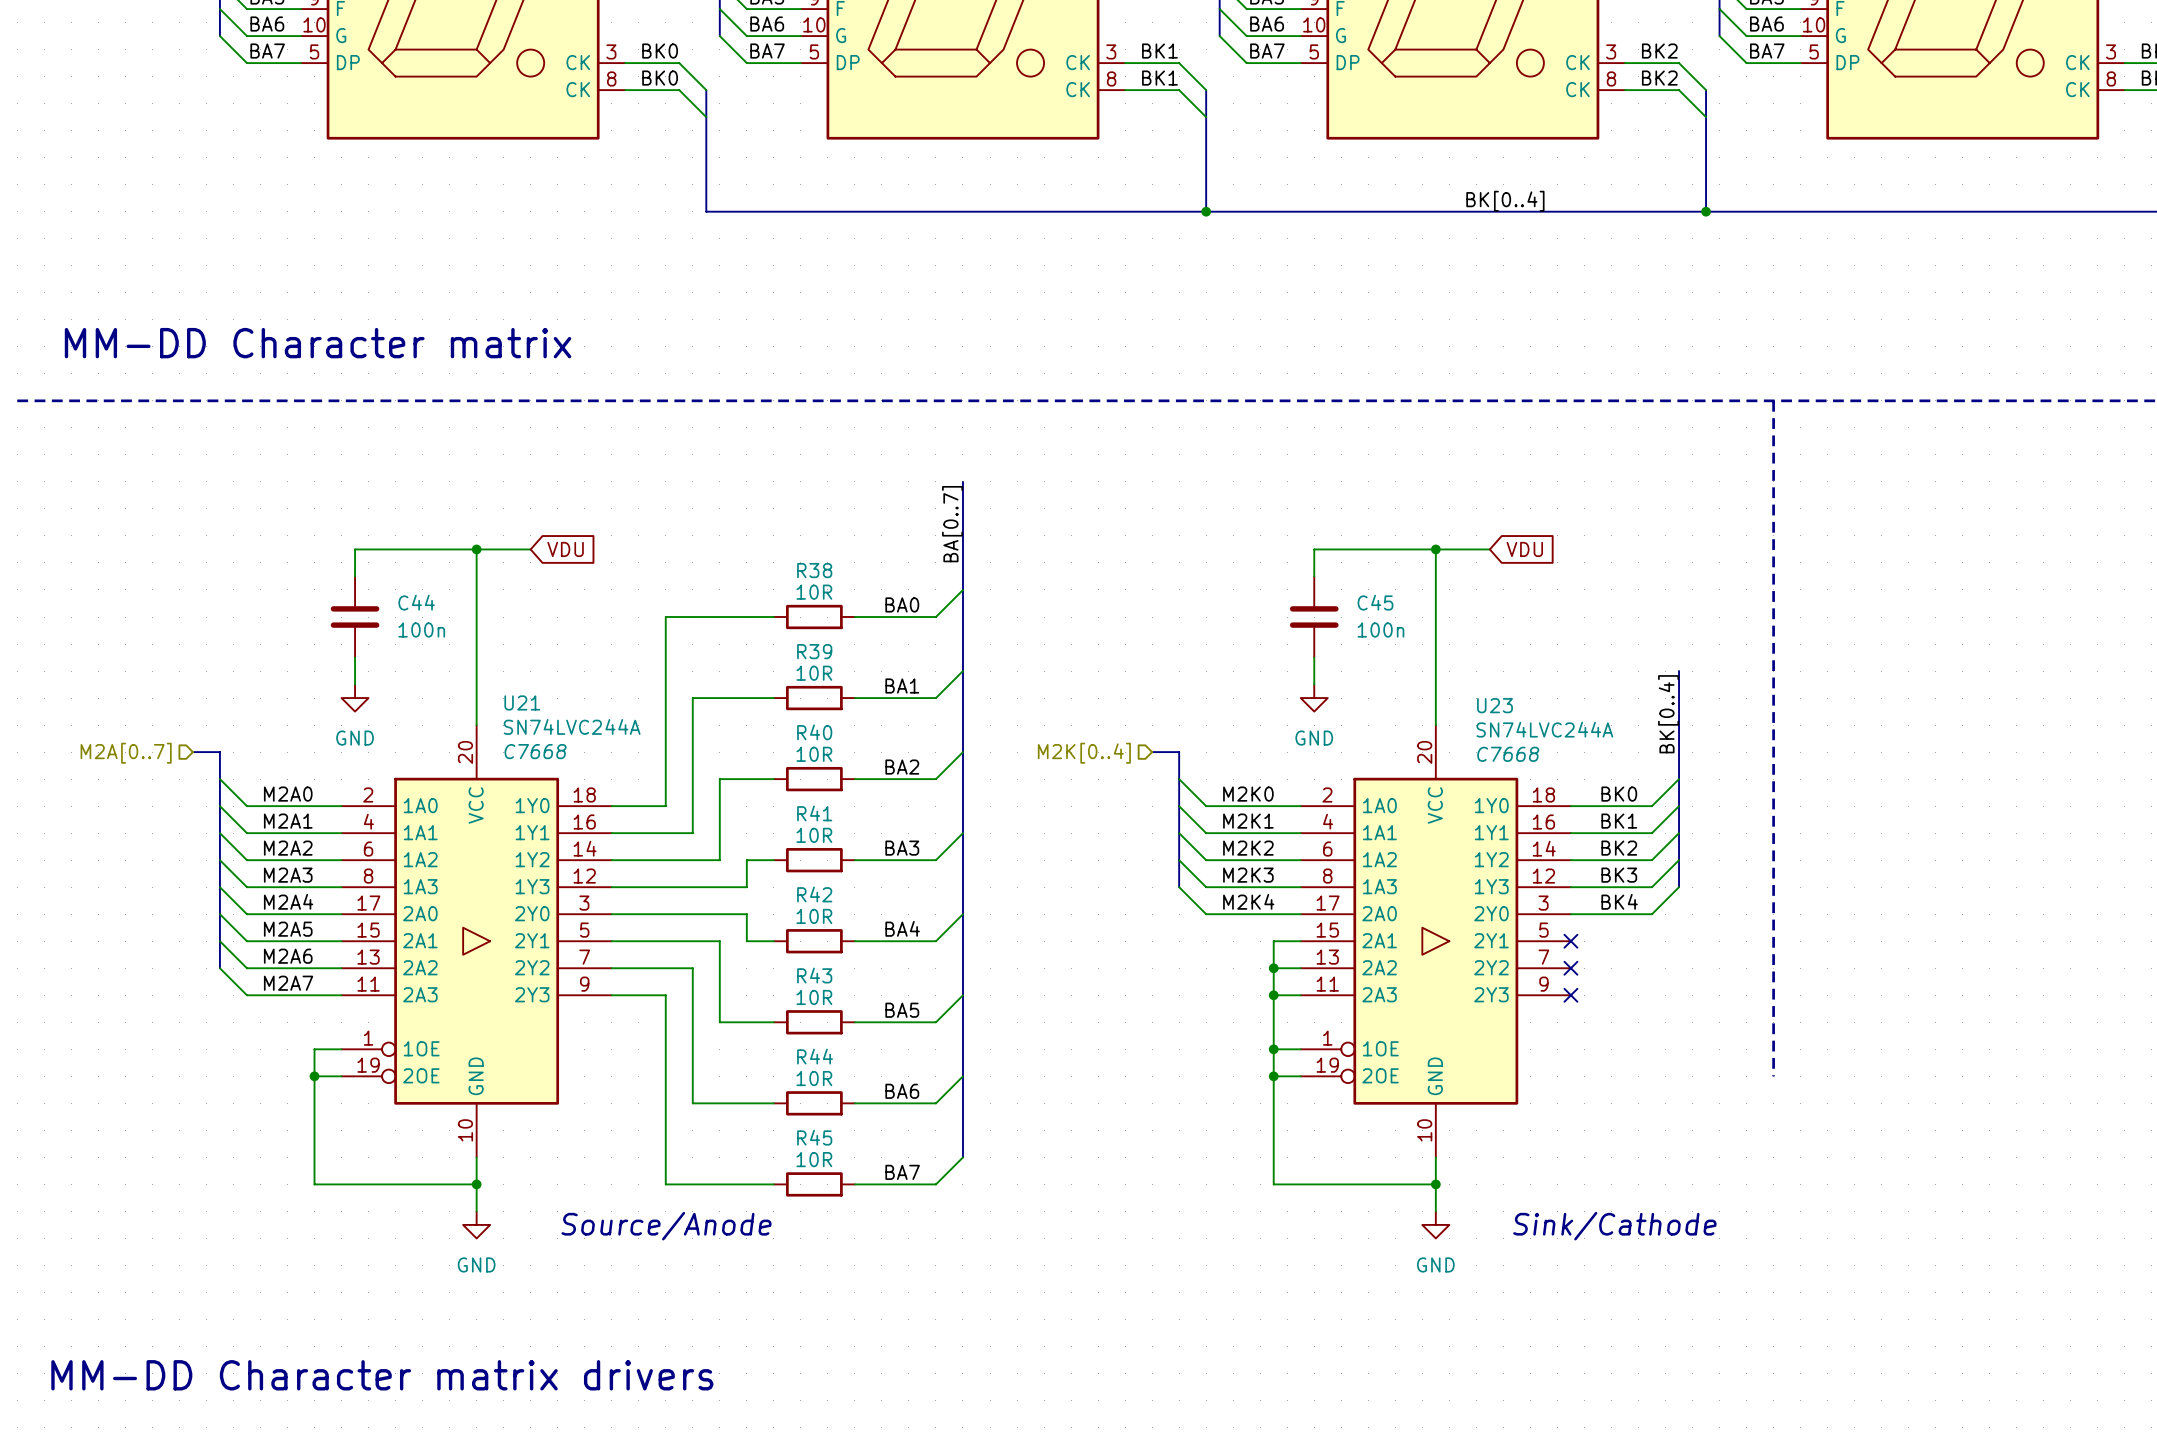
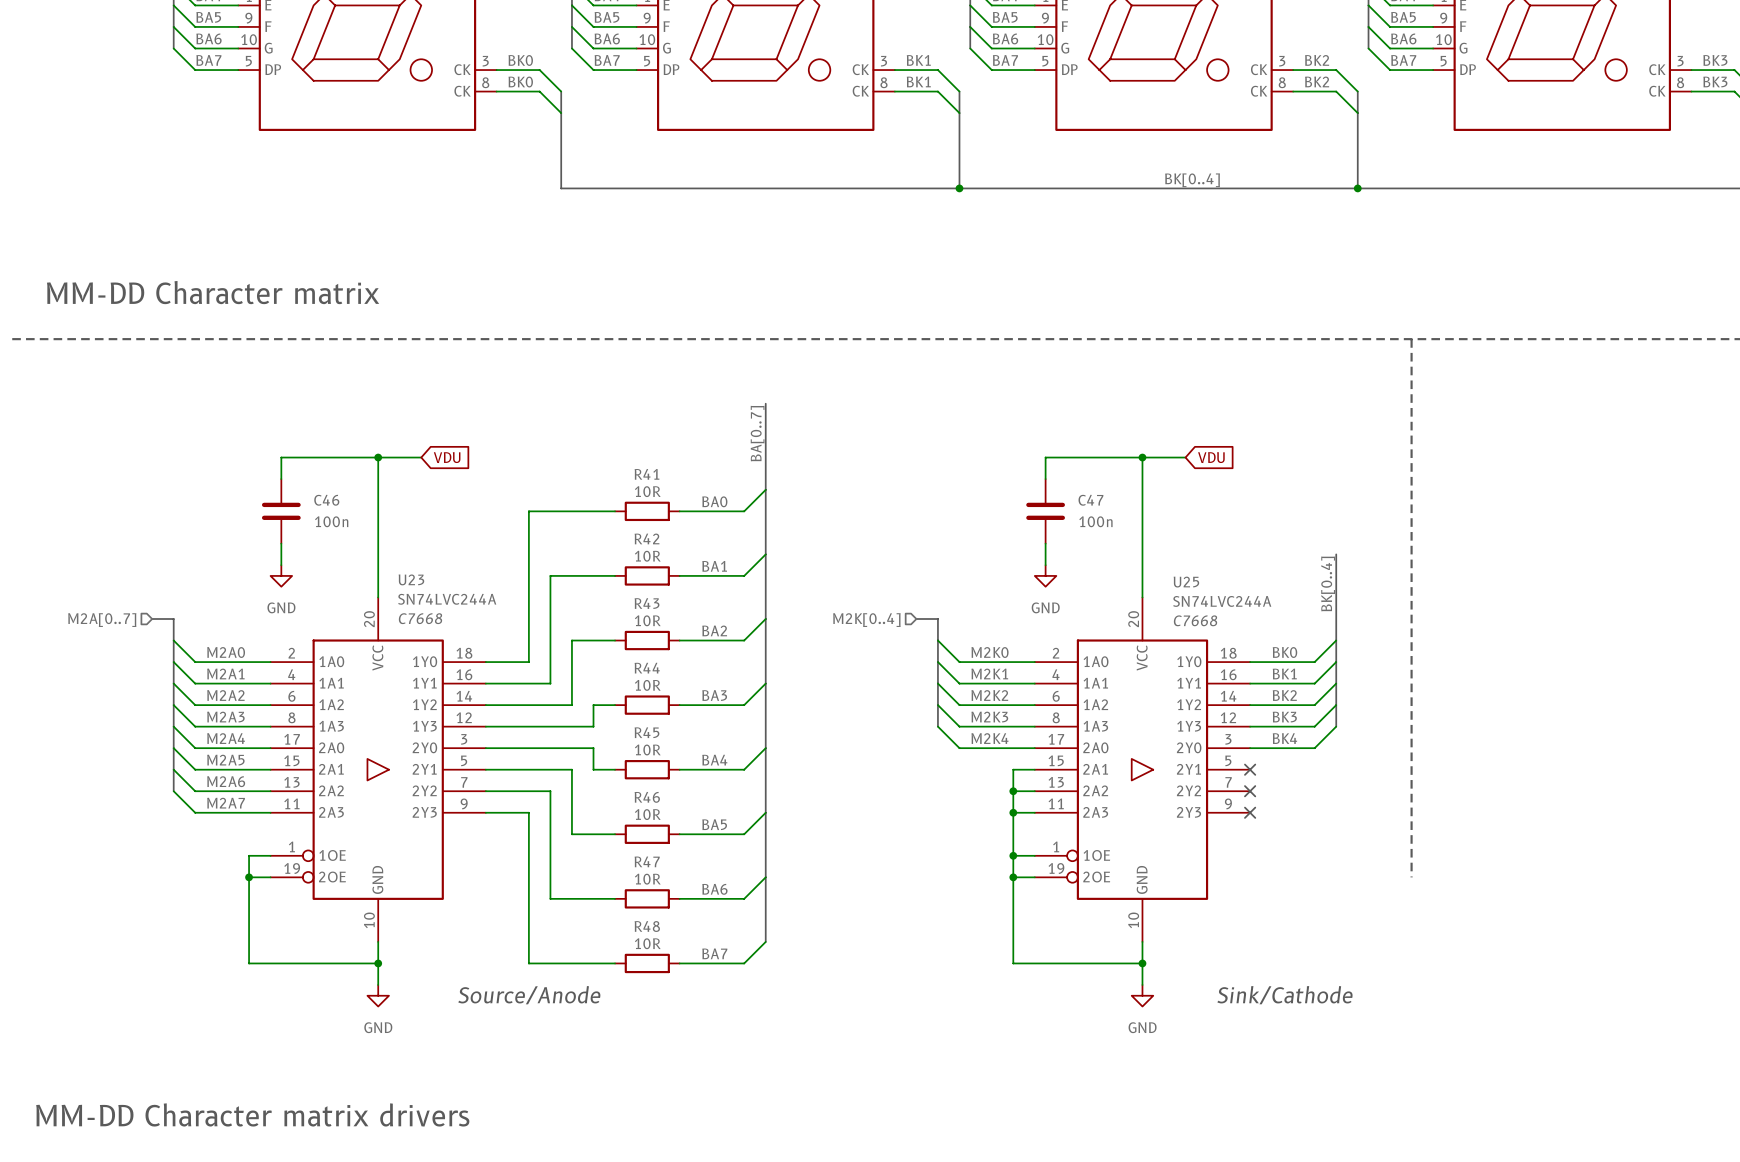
R38 name: R38 (814, 570) -> R41 (646, 474)
C44 name: C44 (416, 602) -> C46 (326, 500)
C45 name: C45 (1375, 602) -> C47 (1090, 500)
R39 name: R39 (814, 651) -> R42 (647, 538)
U21 name: U21 (522, 702) -> U23 (411, 579)
U23 name: U23 (1495, 705) -> U25 (1186, 582)
R40 name: R40 (814, 732) -> R43 (647, 603)
R41 name: R41 (814, 813) -> R44 (647, 668)
R42 name: R42 (814, 894) -> R45 (646, 732)
R43 name: R43 (814, 975) -> R46 (647, 797)
R44 name: R44 (815, 1056) -> R47 (647, 861)
R45 name: R45 (814, 1137) -> R48 (647, 926)

